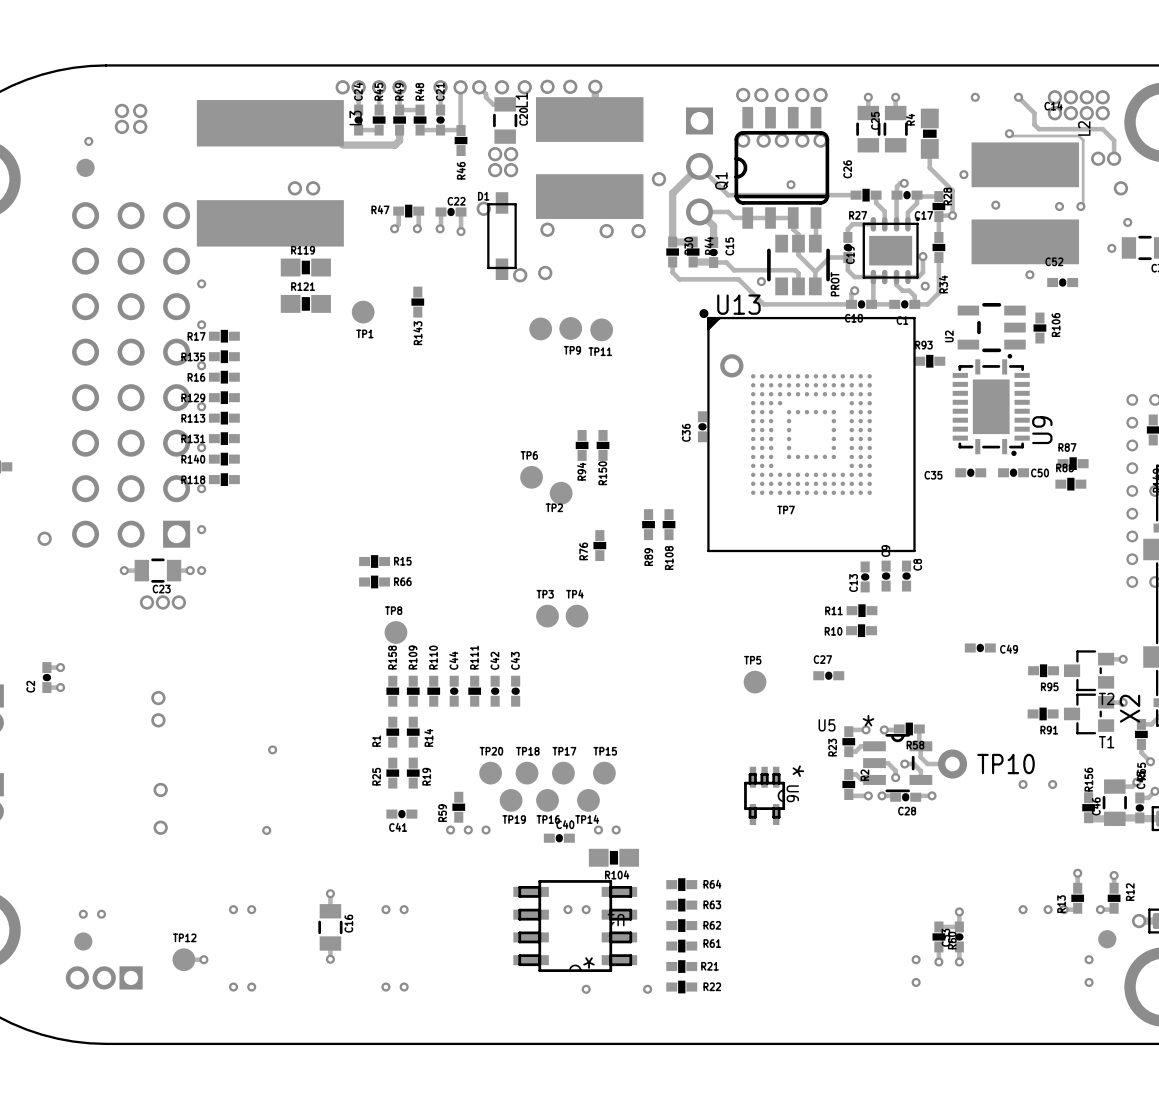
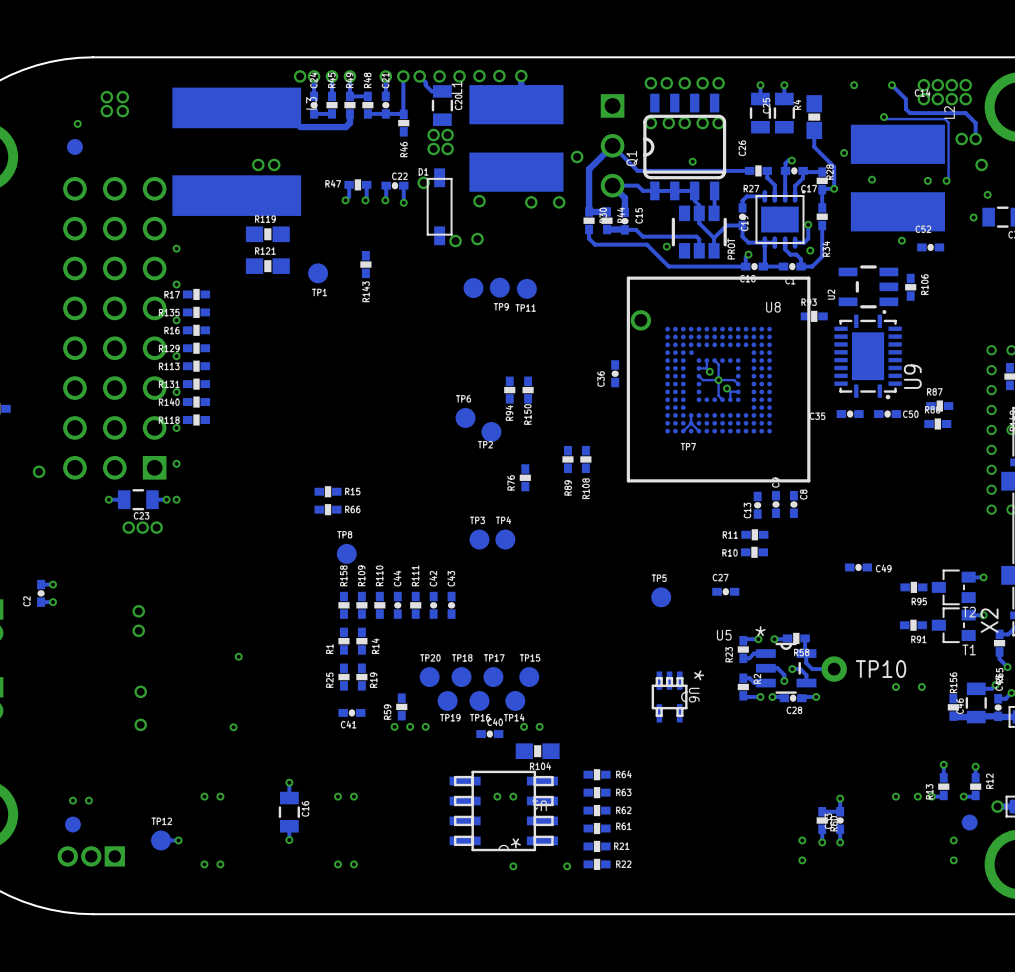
track: none -> (706, 360) (706, 368)
track: none -> (714, 360) (718, 364) (718, 395) (722, 399)
track: none -> (698, 368) (706, 368) (709, 371)
via: none -> (709, 371)
track: none -> (698, 376) (702, 380) (734, 380) (738, 384)
U13: (807, 430) -> none
U8: none -> (718, 379)
via: none -> (718, 380)
track: none -> (726, 388) (730, 391) (730, 399)
via: none -> (726, 388)
track: none -> (738, 391) (730, 391)
track: none -> (691, 415) (691, 423)
track: none -> (691, 423) (698, 431)
track: none -> (691, 423) (683, 431)

